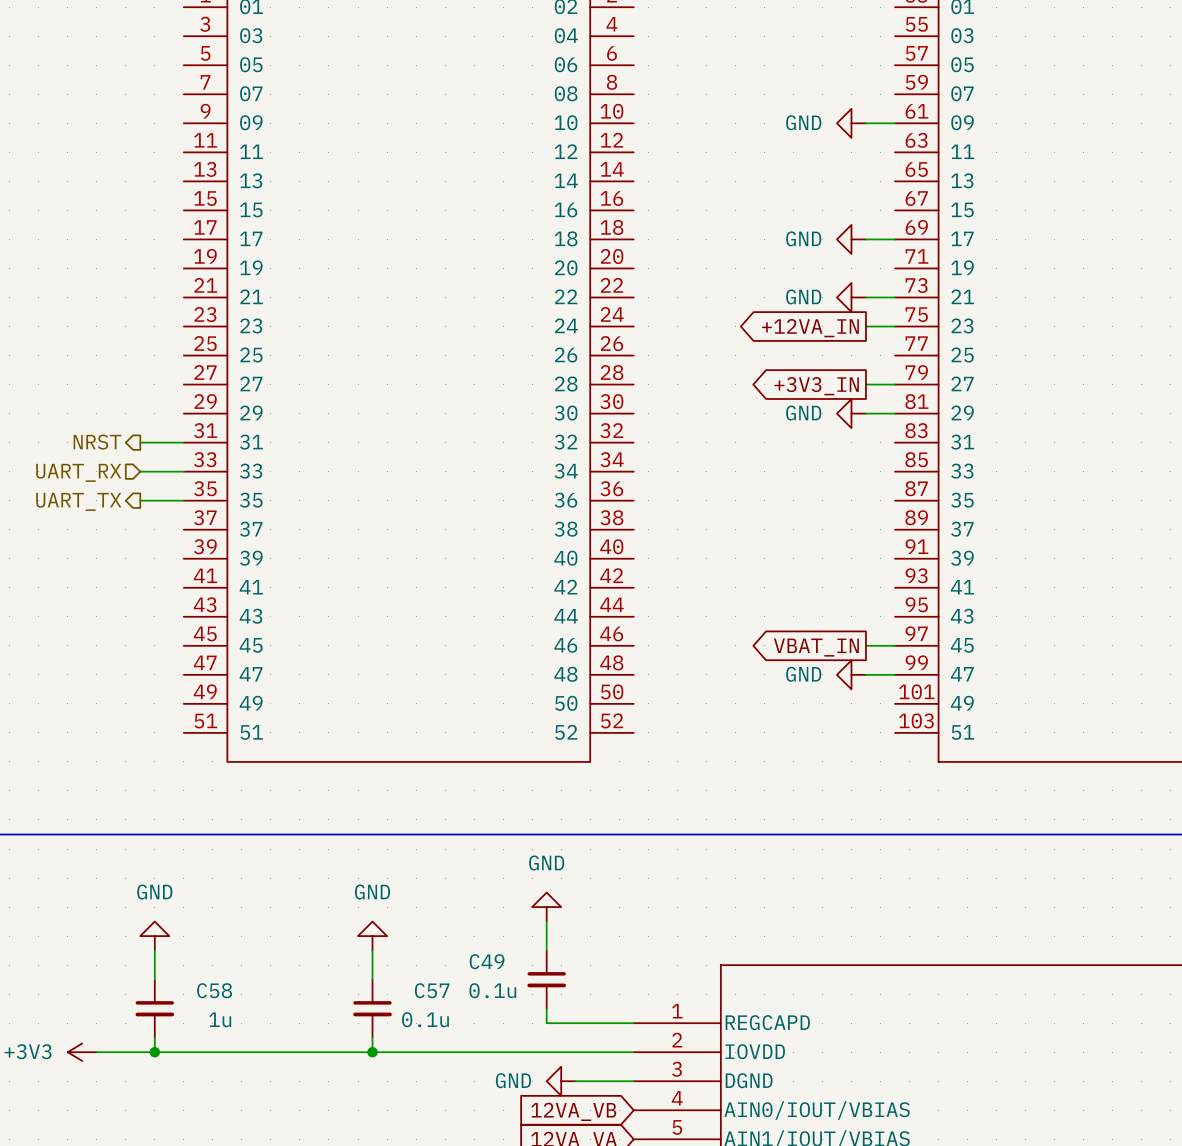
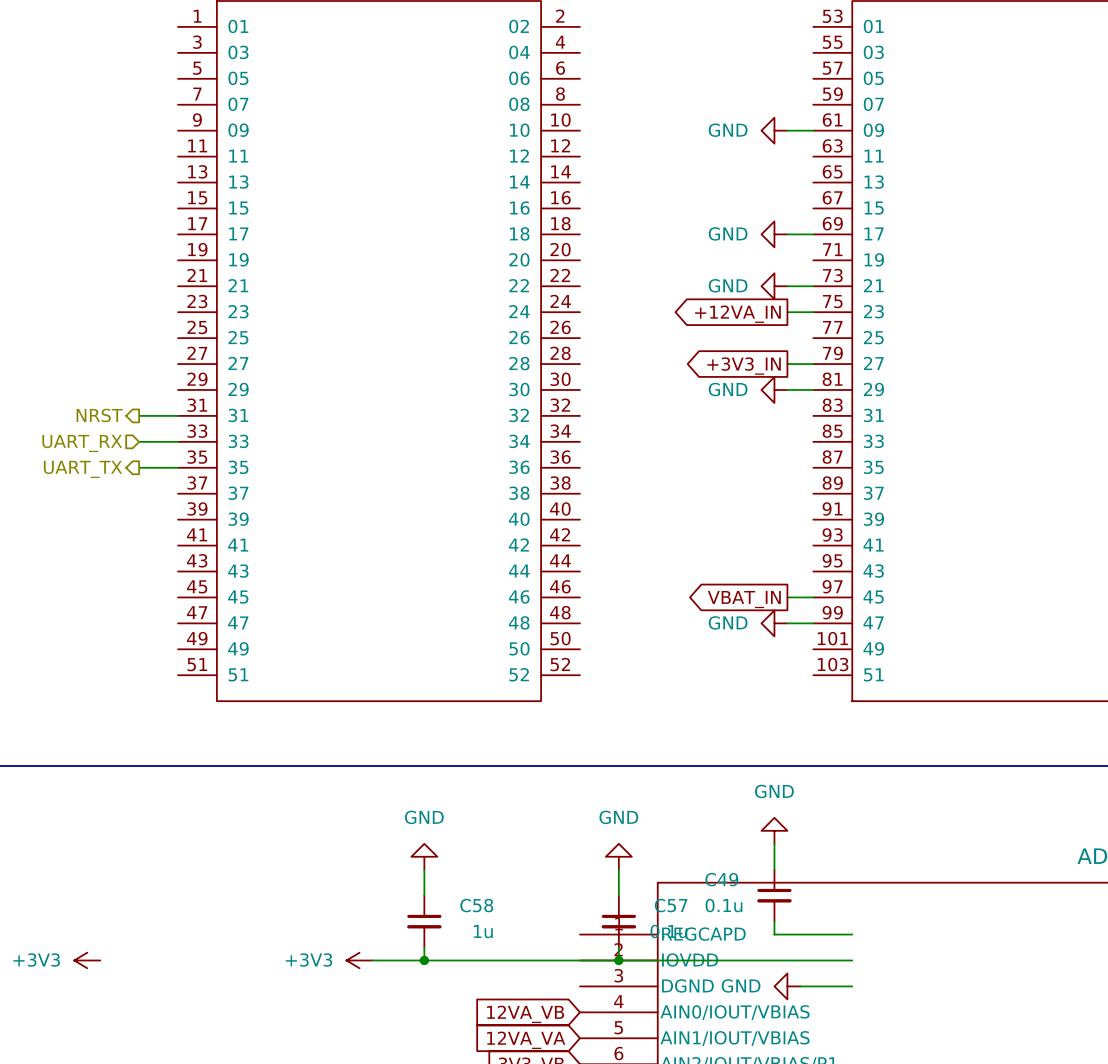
power symbol: GND (546, 907) -> none
power symbol: none -> GND (774, 830)
wire: (546, 921) (546, 950) -> (618, 869) (618, 895)
wire: none -> (774, 843) (774, 869)
power symbol: GND (154, 936) -> none
power symbol: GND (372, 936) -> none
power symbol: none -> GND (424, 856)
power symbol: none -> GND (618, 856)
wire: (154, 950) (154, 979) -> none
wire: (372, 950) (372, 979) -> (424, 869) (424, 895)
C49 position: (546, 979) -> (774, 895)
C58 position: (154, 1008) -> (424, 921)
C57 position: (372, 1008) -> (618, 921)
wire: (546, 1008) (546, 1023) (633, 1023) -> none
wire: none -> (774, 921) (774, 934) (852, 934)
wire: (154, 1037) (154, 1052) -> none
wire: (372, 1037) (372, 1052) -> (424, 947) (424, 960)
wire: none -> (618, 947) (618, 960)
wire: (96, 1052) (401, 1052) -> none
junction: (154, 1052) -> none
junction: (372, 1052) -> none
power symbol: none -> +3V3 (359, 960)
junction: none -> (424, 960)
wire: none -> (579, 960) (852, 960)
junction: none -> (618, 960)
power symbol: GND (561, 1081) -> none
wire: (575, 1081) (633, 1081) -> none
power symbol: none -> GND (787, 986)
wire: none -> (800, 986) (852, 986)

